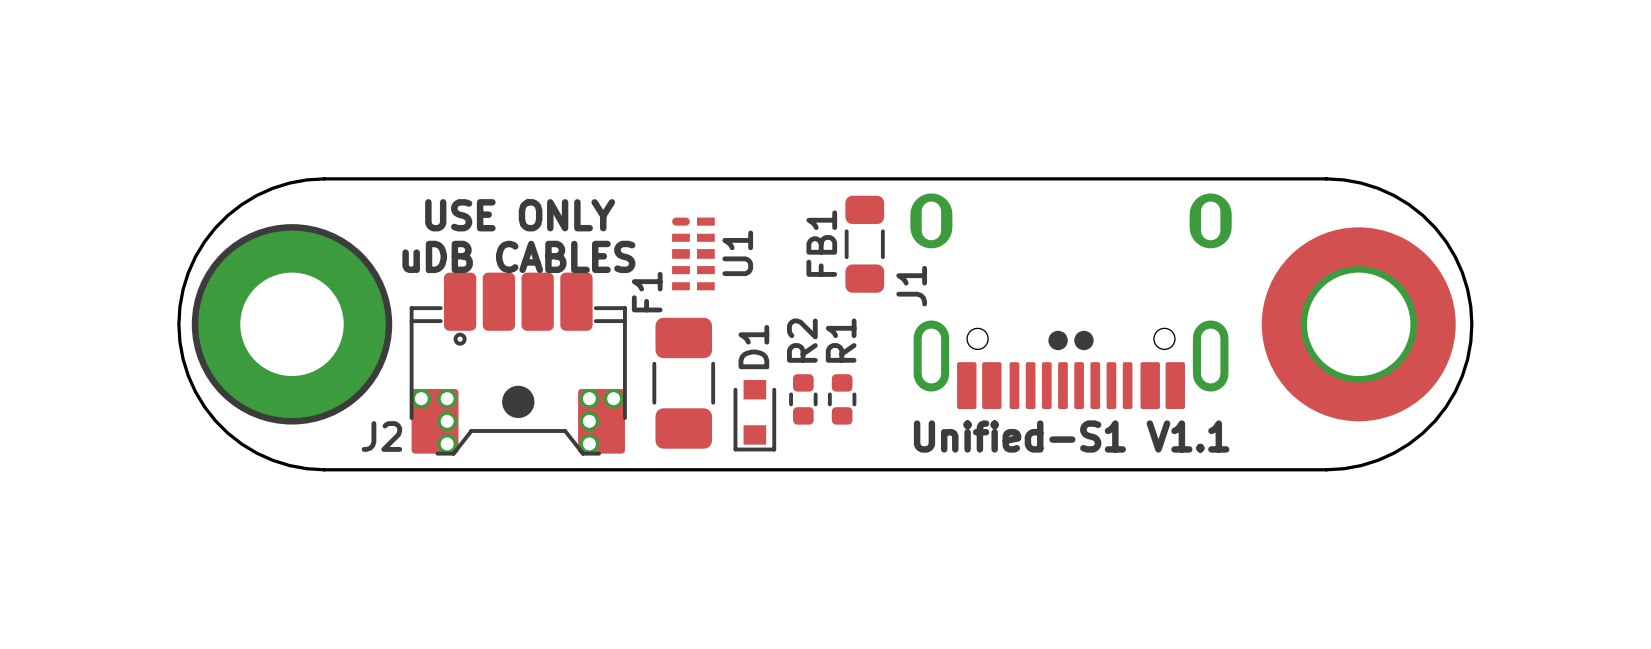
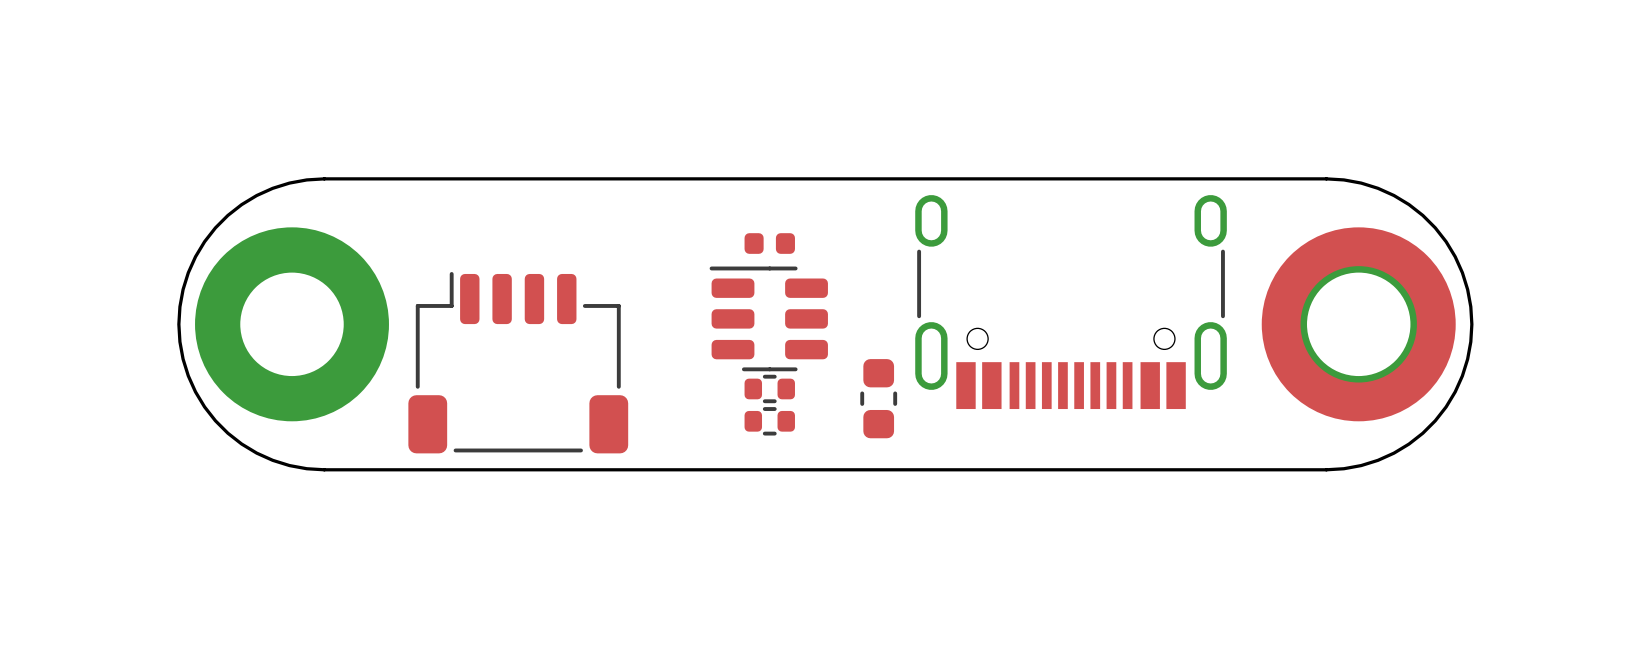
text: USE ONLY (520, 215) -> none
drawing: [191, 224, 393, 425] -> none
part: none -> (769, 243)
FB1: (864, 244) -> none
U1: (684, 252) -> none
text: uDB CABLES (518, 256) -> none
J1: (1071, 301) -> none
part: none -> (1071, 302)
part: none -> (768, 318)
drawing: [1048, 330, 1094, 351] -> none
part: none -> (518, 362)
J2: (518, 364) -> none
F1: (683, 383) -> none
drawing: [502, 385, 535, 419] -> none
part: none -> (769, 388)
part: none -> (878, 398)
R2: (803, 399) -> none
R1: (842, 399) -> none
D1: (754, 415) -> none
part: none -> (769, 421)
text: Unified-S1 V1.1 (1071, 436) -> none

